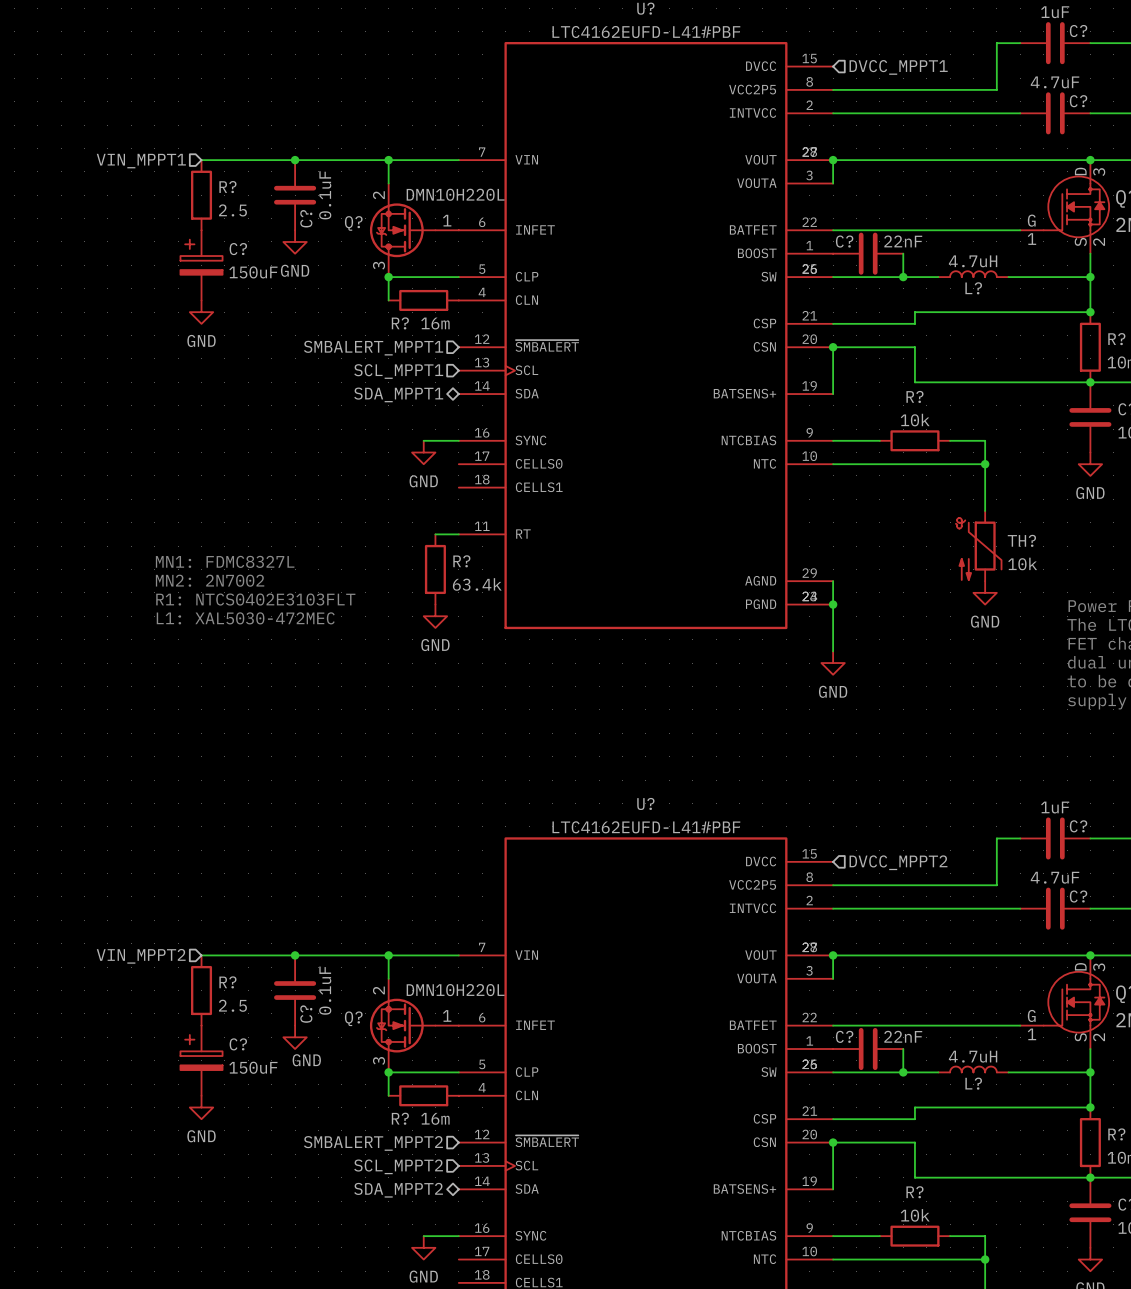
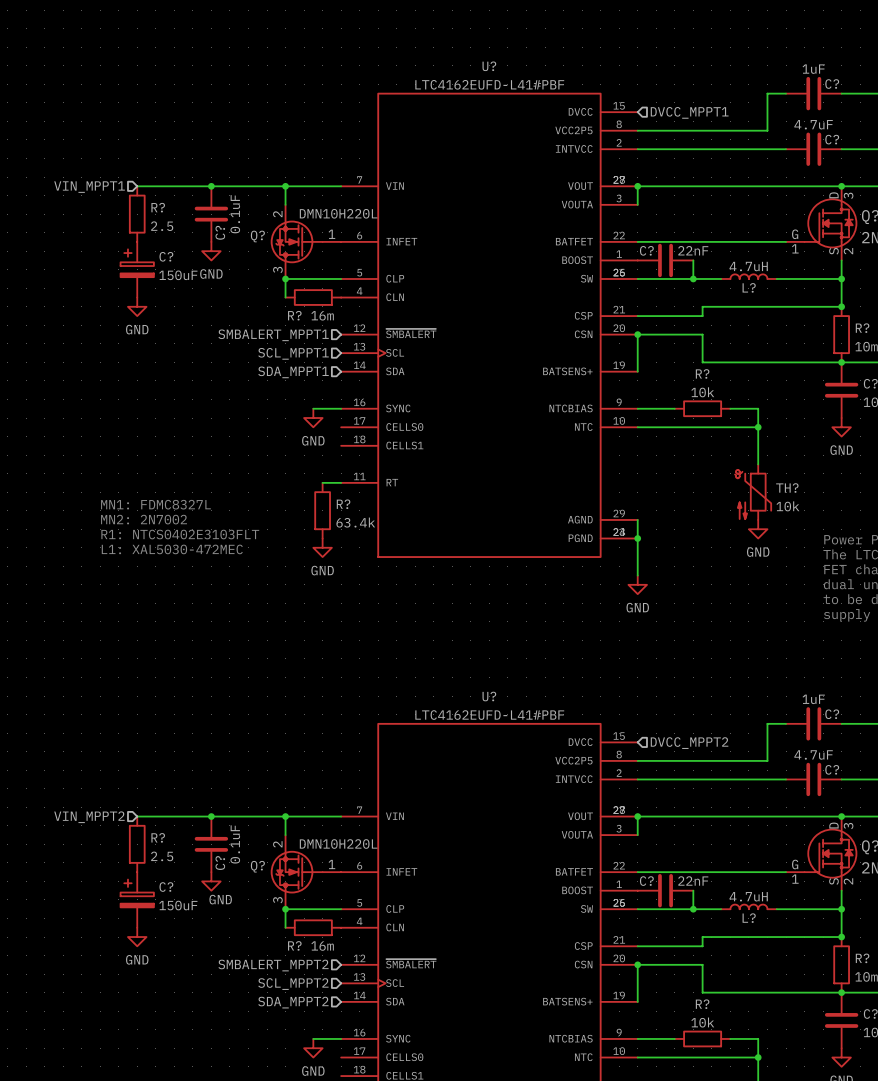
hierarchical label shape: bidirectional (398, 394) -> input (293, 372)
hierarchical label shape: bidirectional (398, 1190) -> input (293, 1002)

